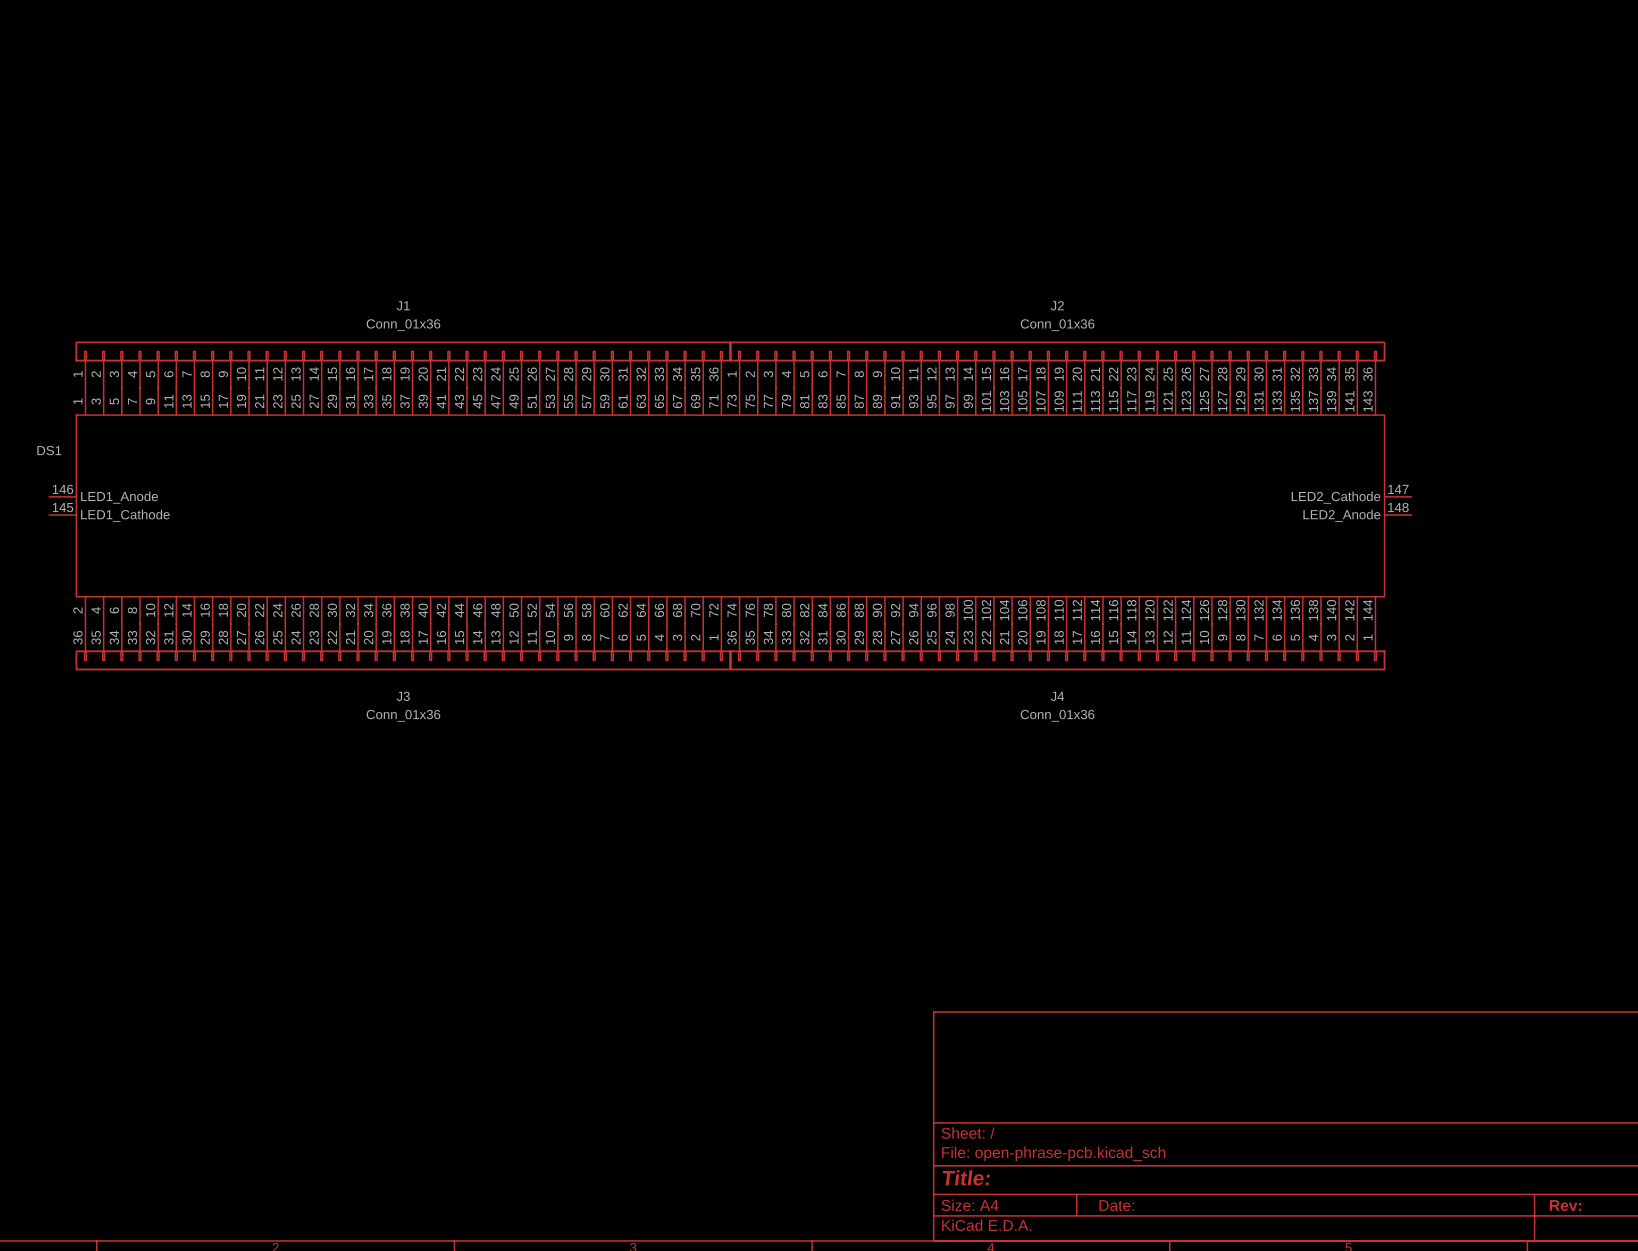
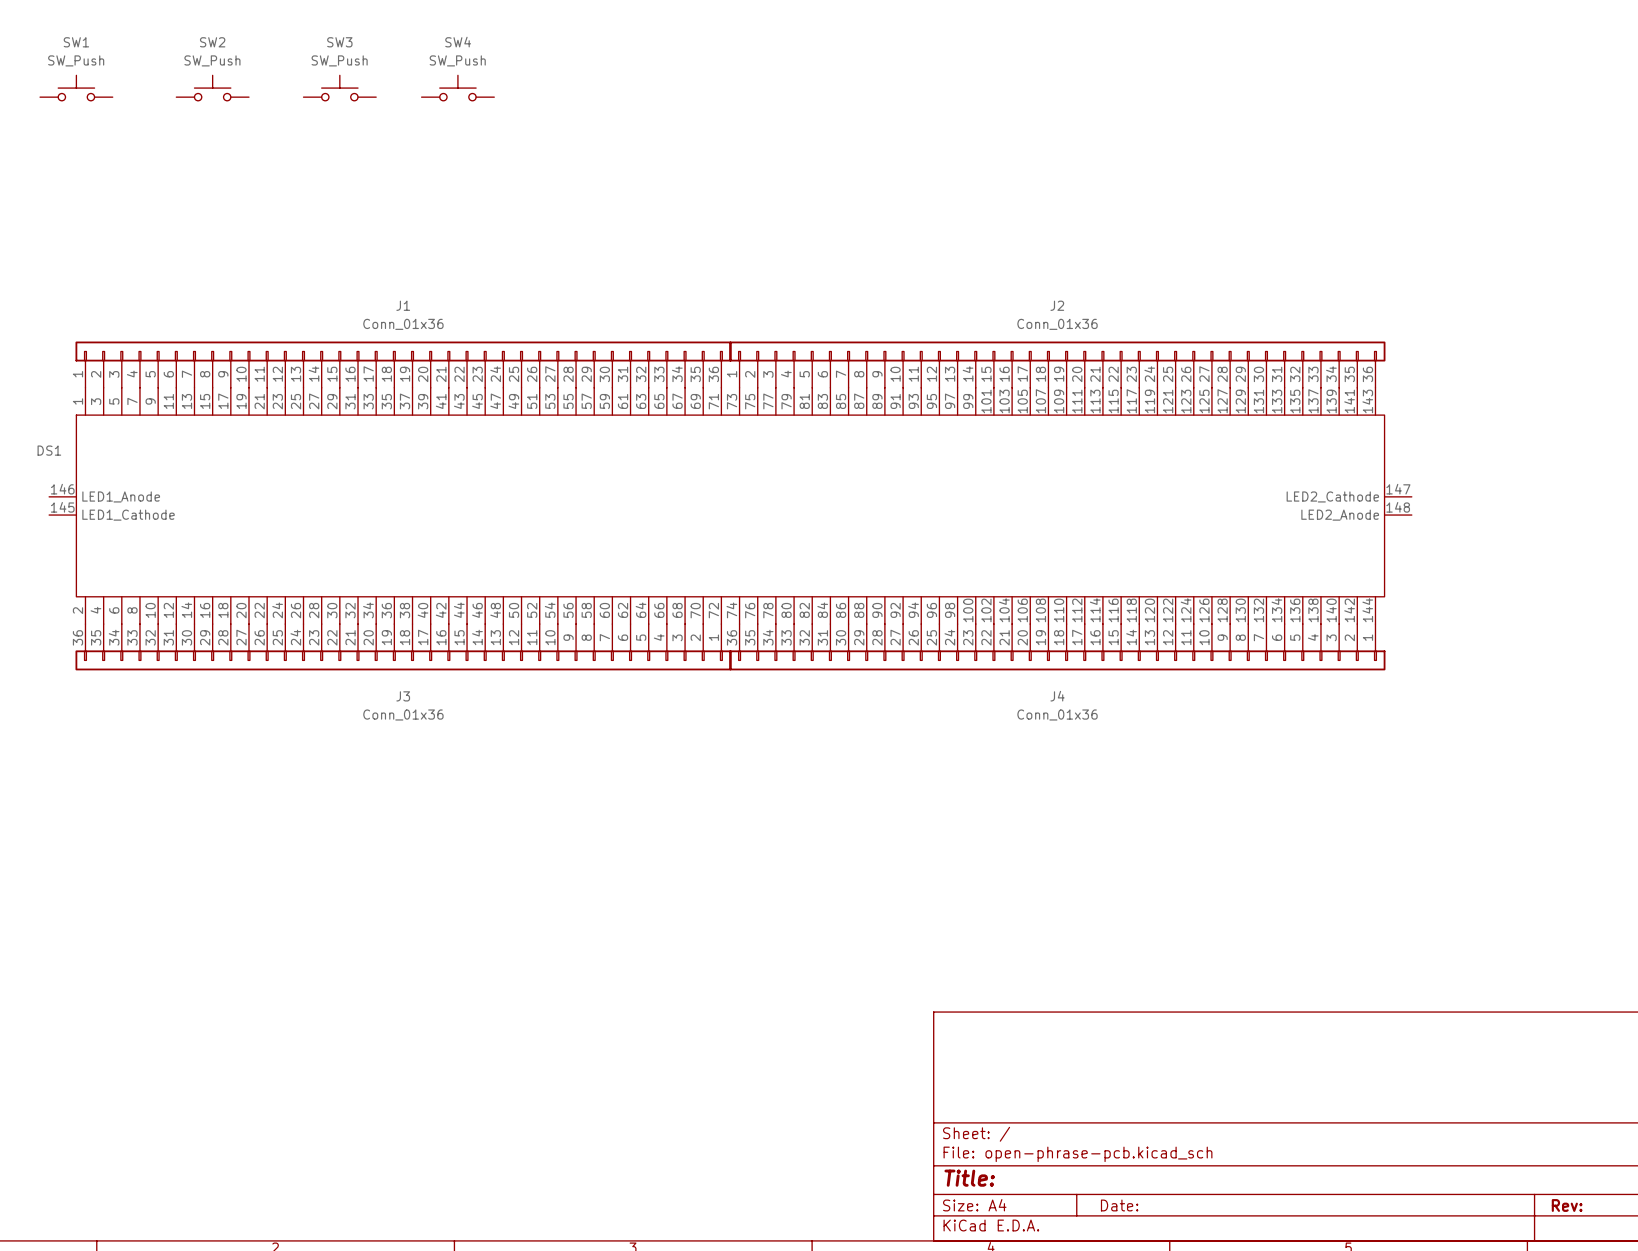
SW1: none -> SW_Push (76, 88)
SW2: none -> SW_Push (212, 88)
SW3: none -> SW_Push (339, 88)
SW4: none -> SW_Push (457, 88)

